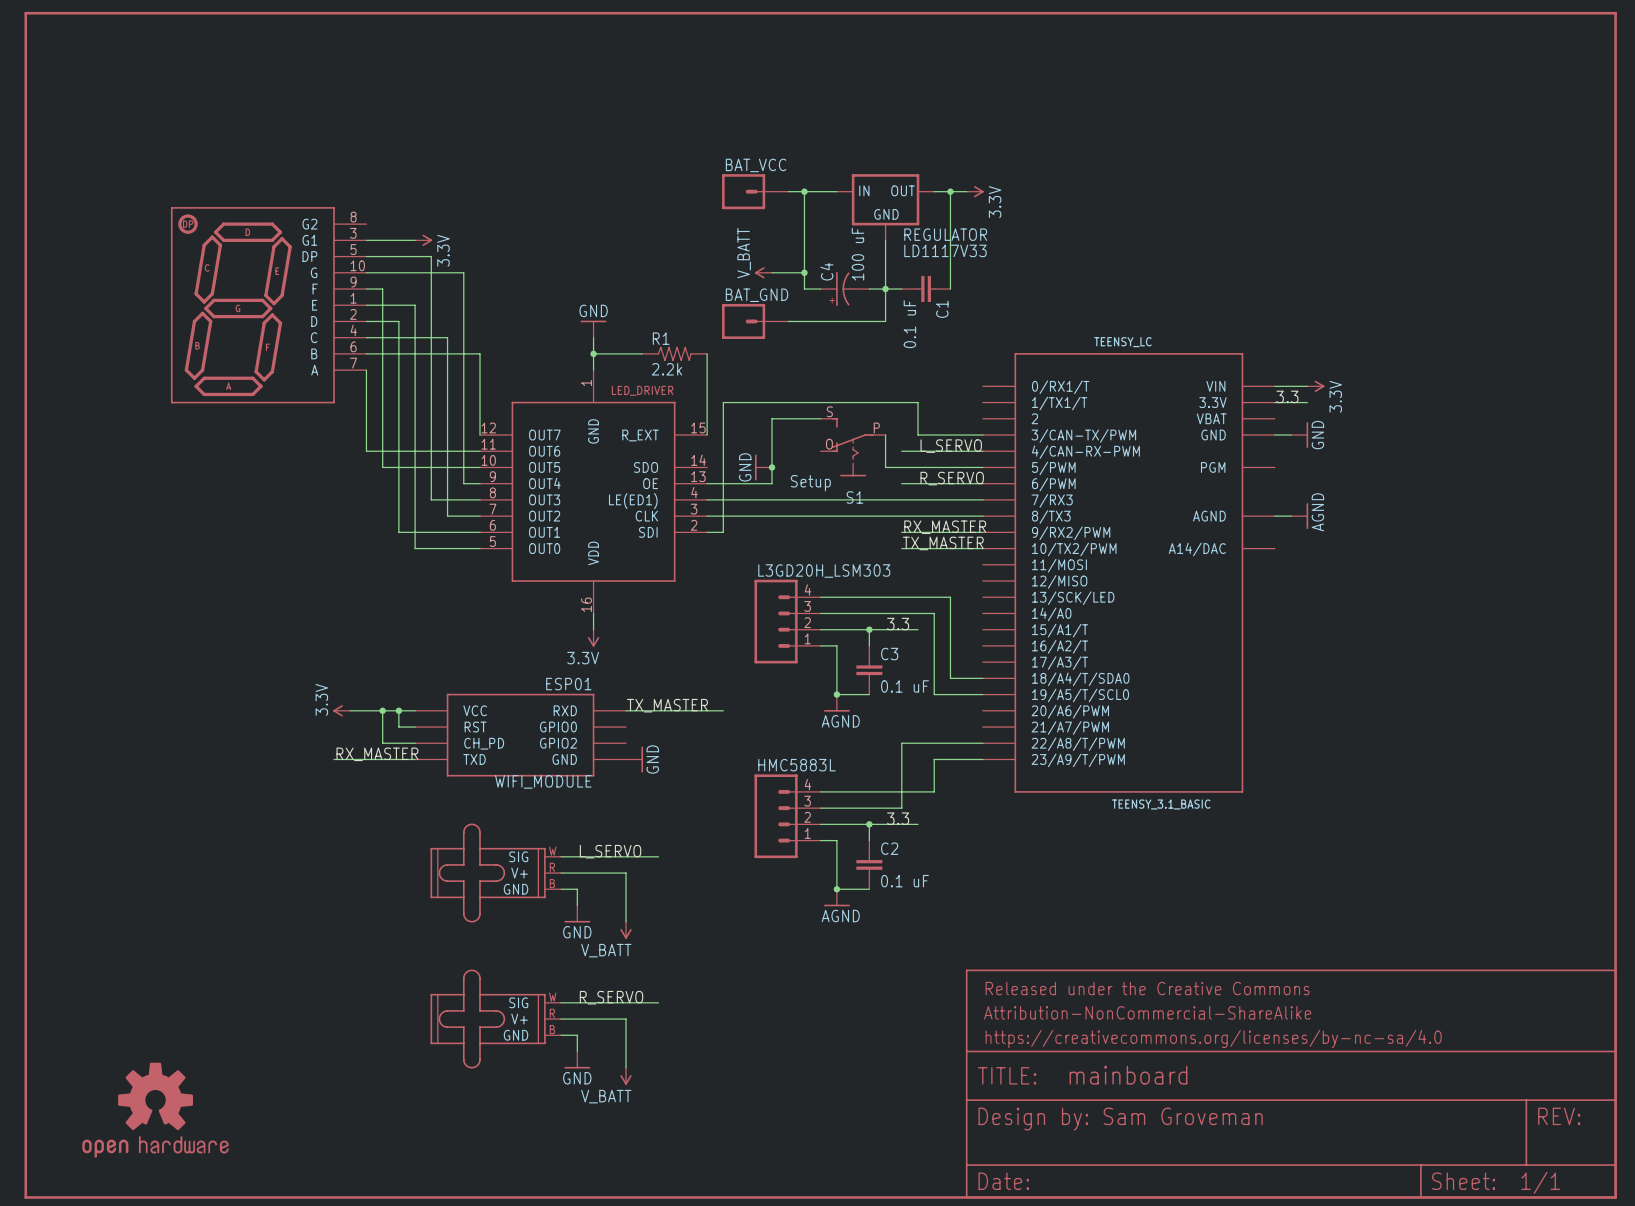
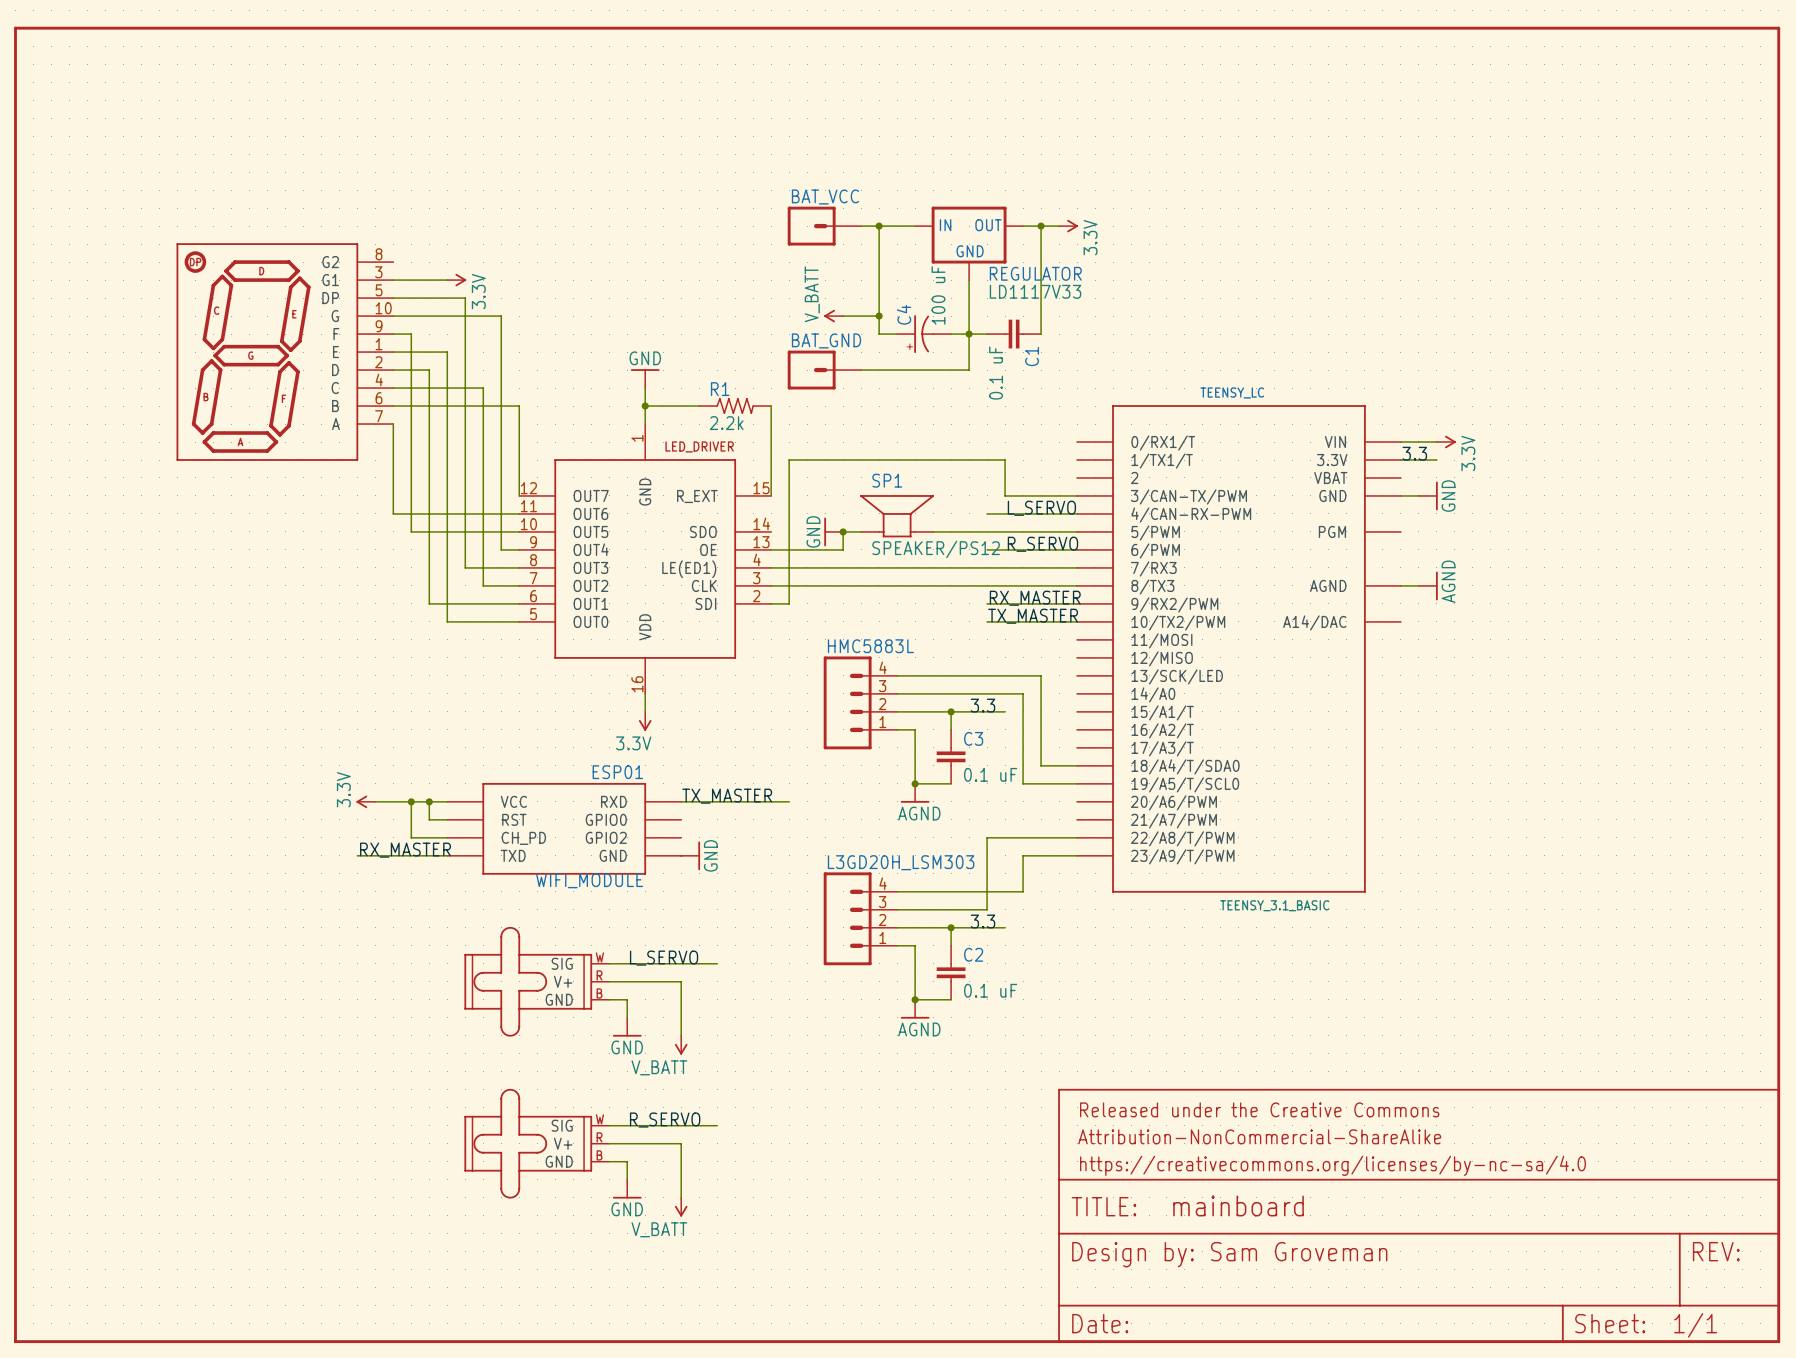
wire: (820, 418) (772, 418) (772, 467) -> (861, 531) (843, 531)
wire: (885, 435) (885, 467) -> (933, 531) (969, 531)
S1: Setup (853, 447) -> none
SP1: none -> SPEAKER/PS12 (897, 516)
L3GD20H_LSM303 name: L3GD20H_LSM303 (824, 571) -> HMC5883L (870, 646)
HMC5883L name: HMC5883L (797, 765) -> L3GD20H_LSM303 (901, 862)
part: (155, 1110) -> none

